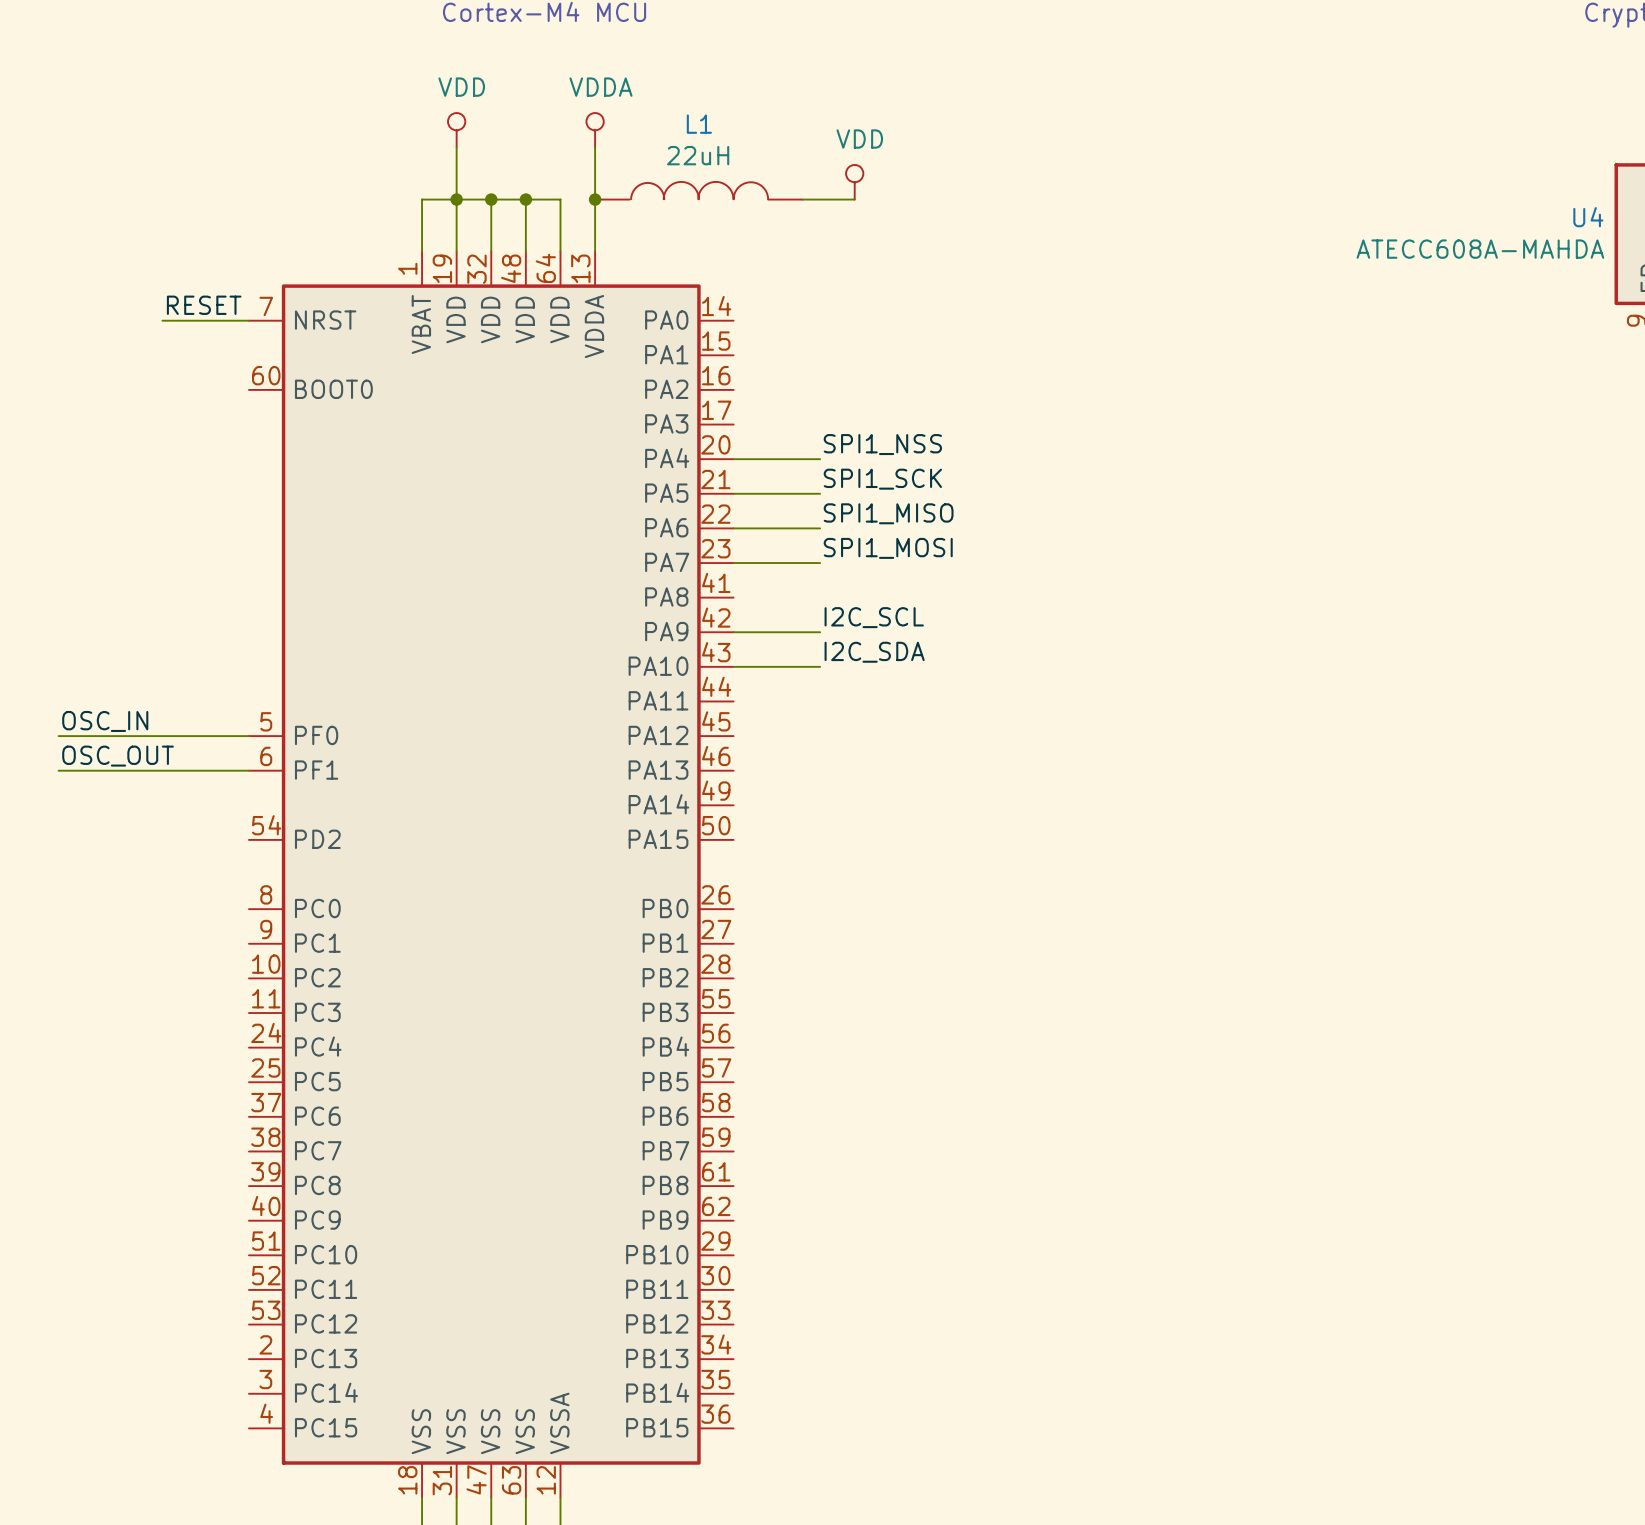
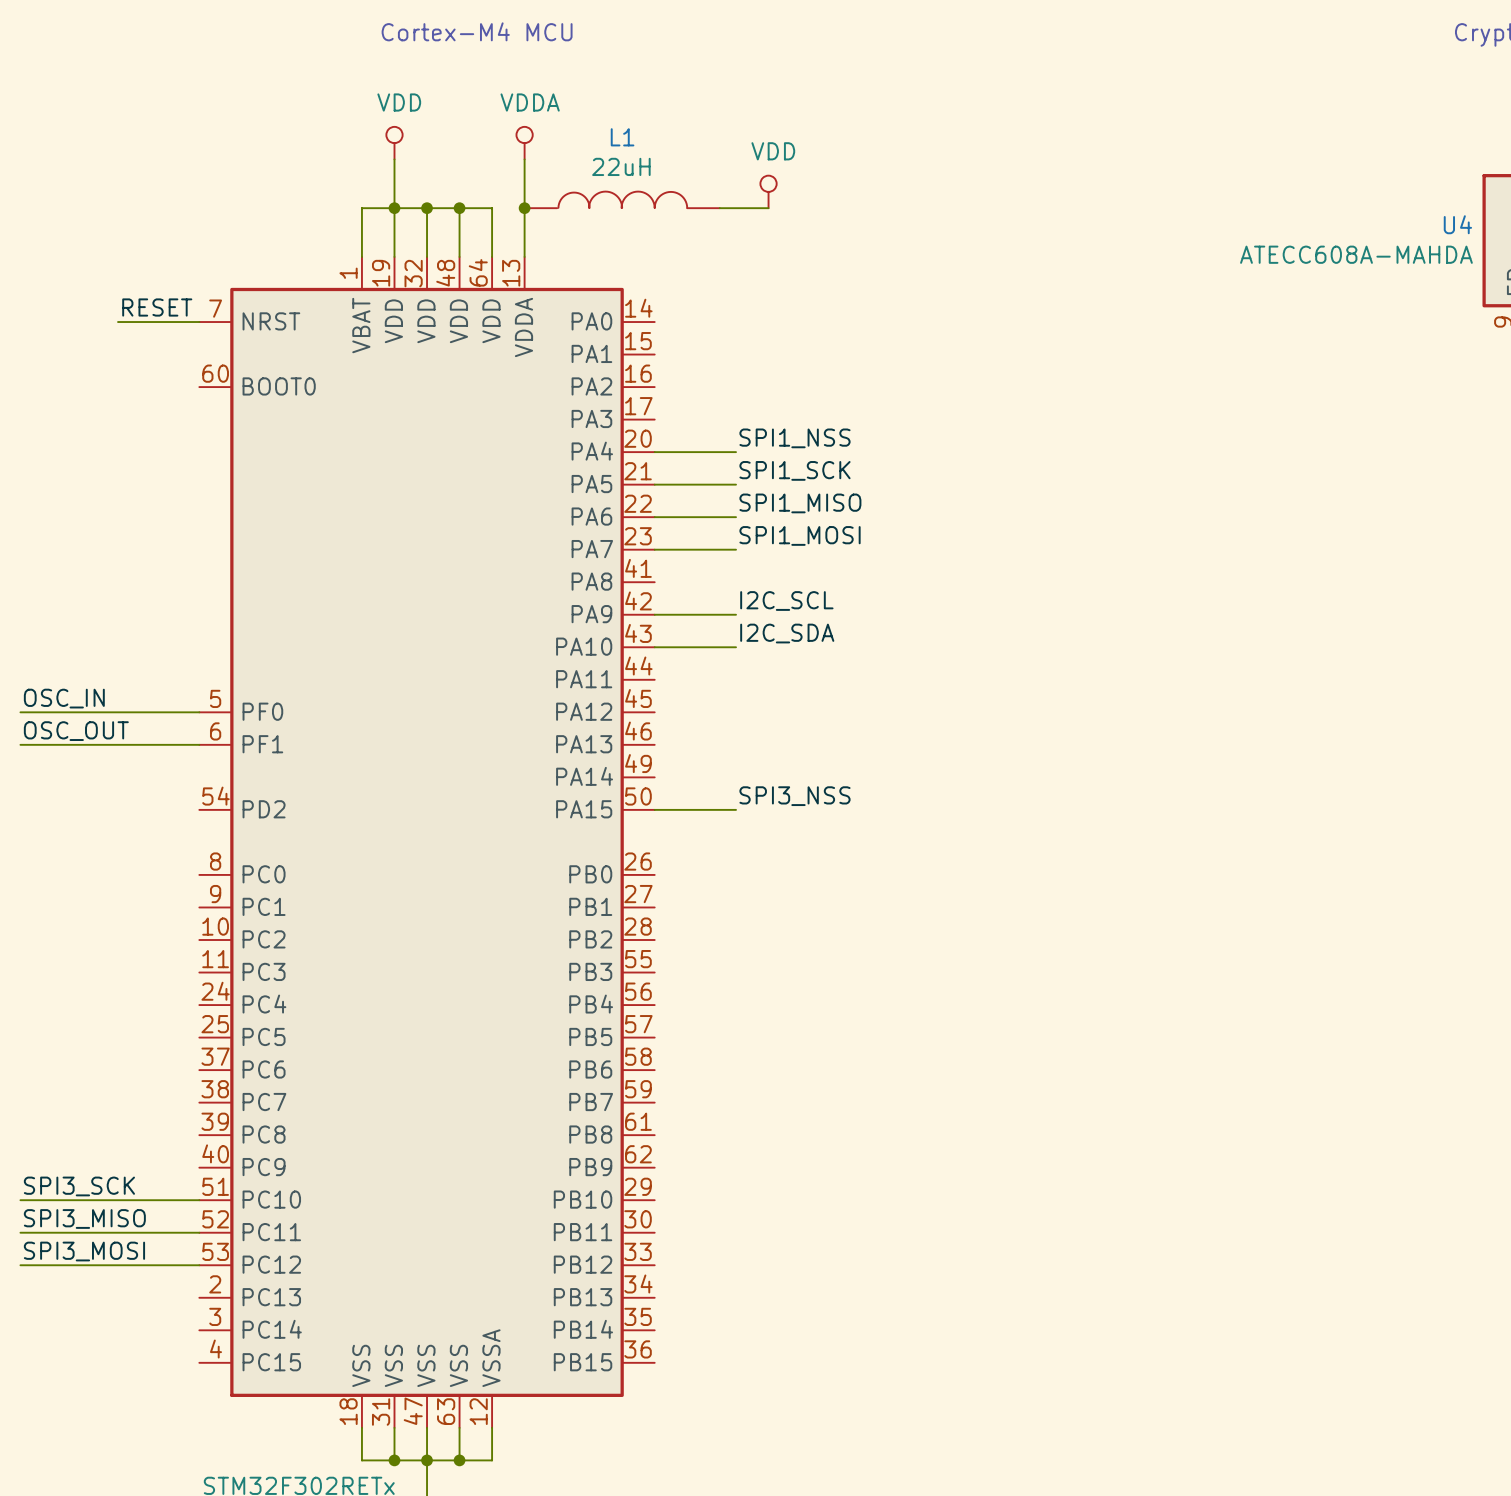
label: none -> SPI3_NSS (794, 796)
wire: none -> (654, 809) (736, 809)
label: none -> SPI3_SCK (79, 1186)
wire: none -> (20, 1200) (199, 1200)
label: none -> SPI3_MISO (84, 1218)
wire: none -> (20, 1232) (199, 1232)
label: none -> SPI3_MOSI (84, 1251)
wire: none -> (20, 1265) (199, 1265)

